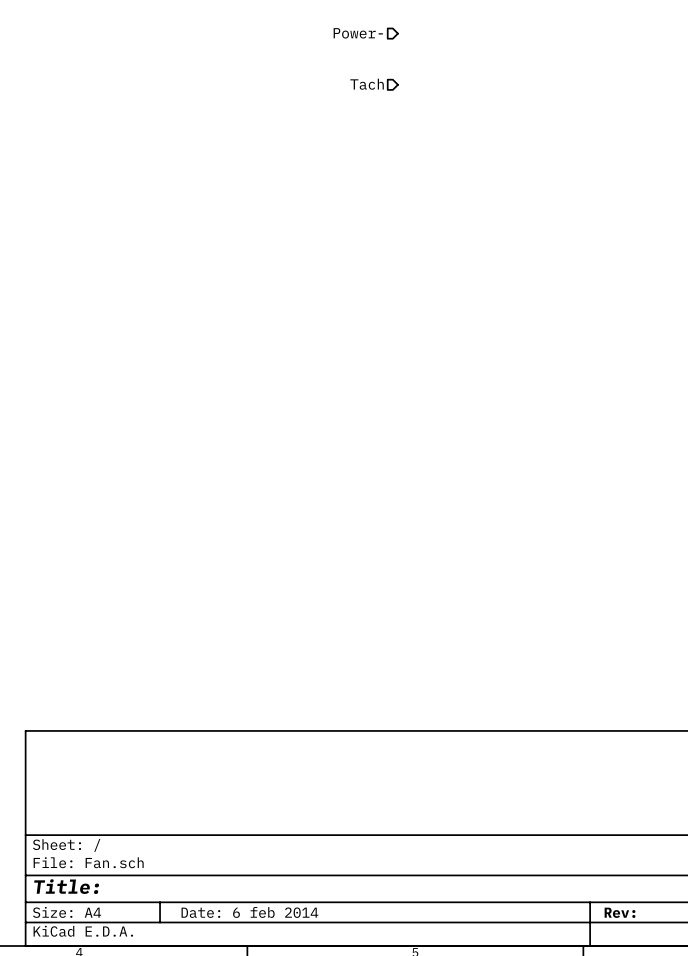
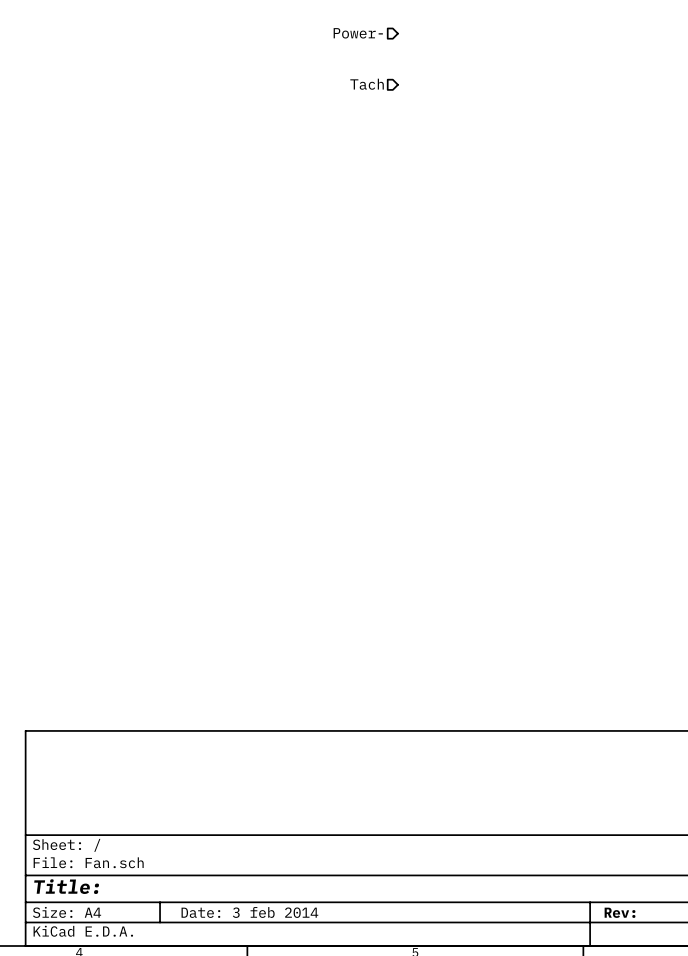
title block: Date: 6 feb 2014 (249, 912) -> Date: 3 feb 2014 (249, 912)

